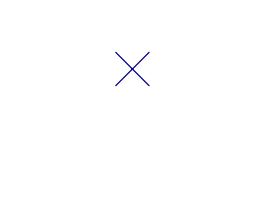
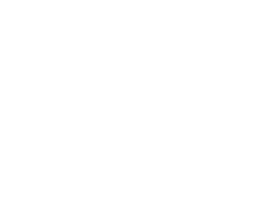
no-connect mark: (132, 69) -> none

